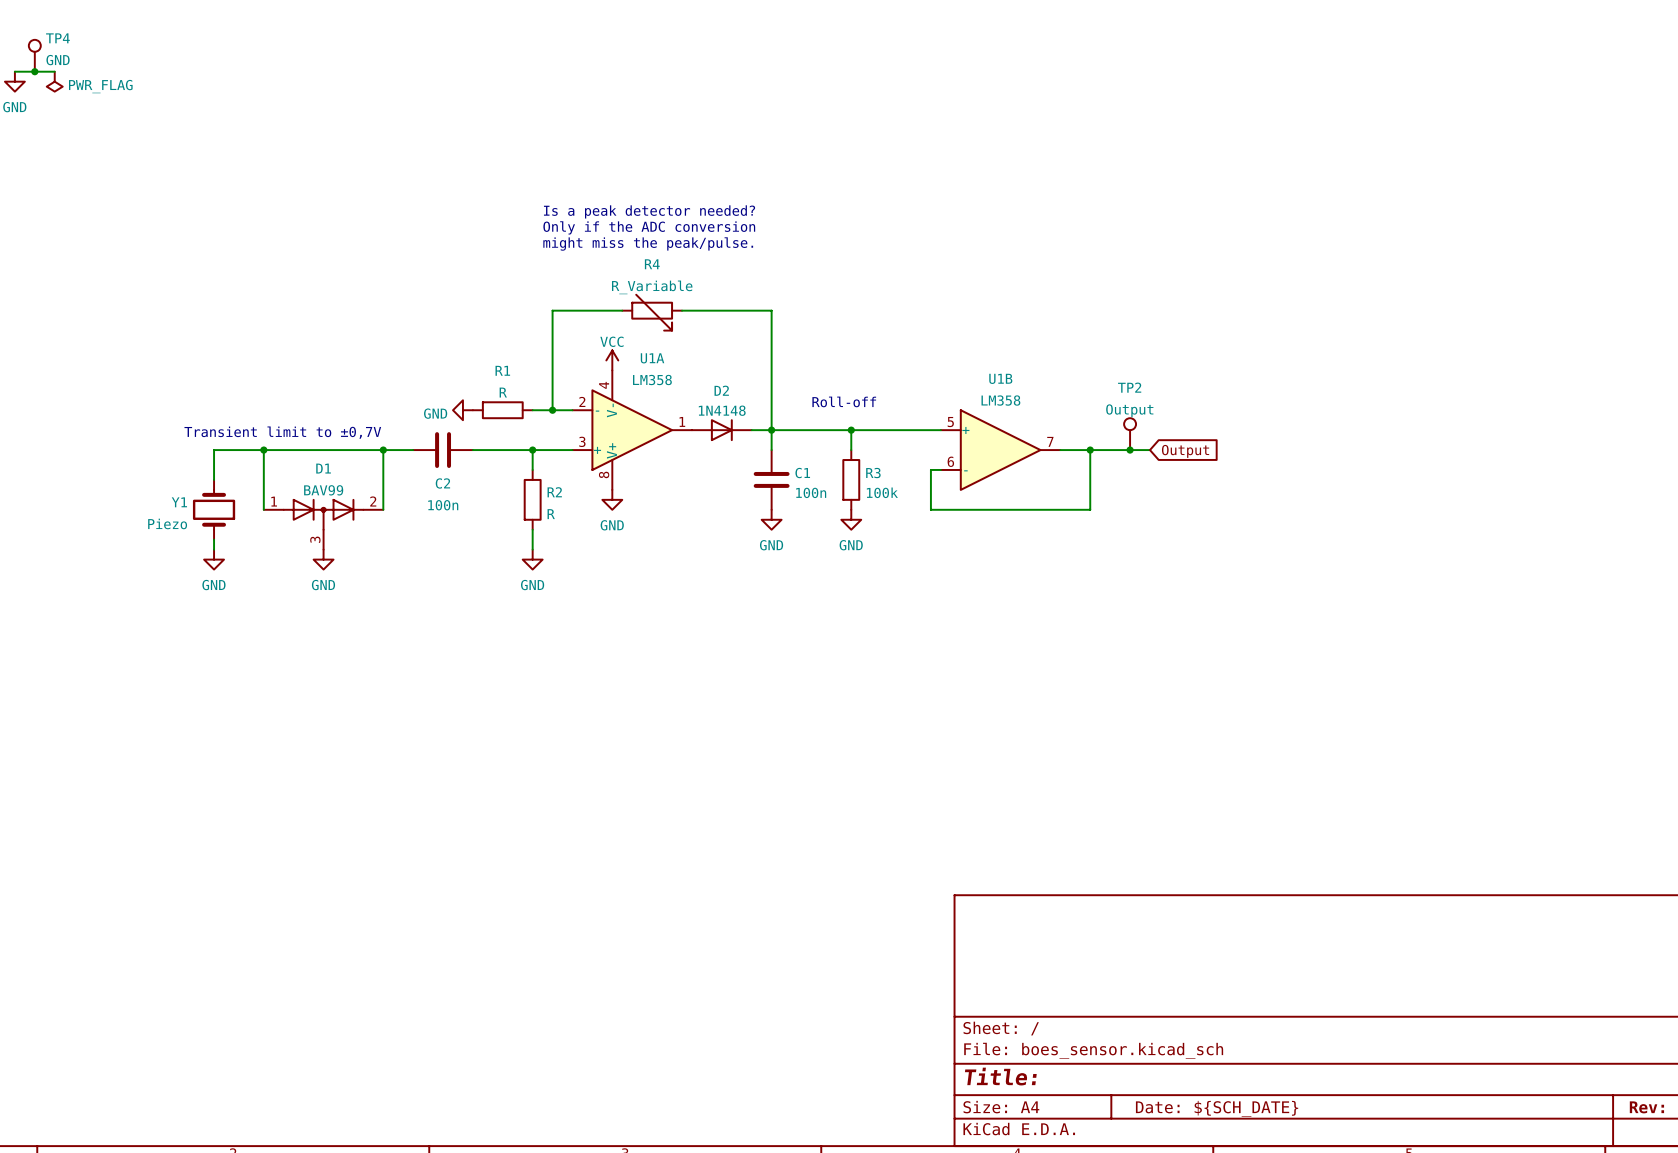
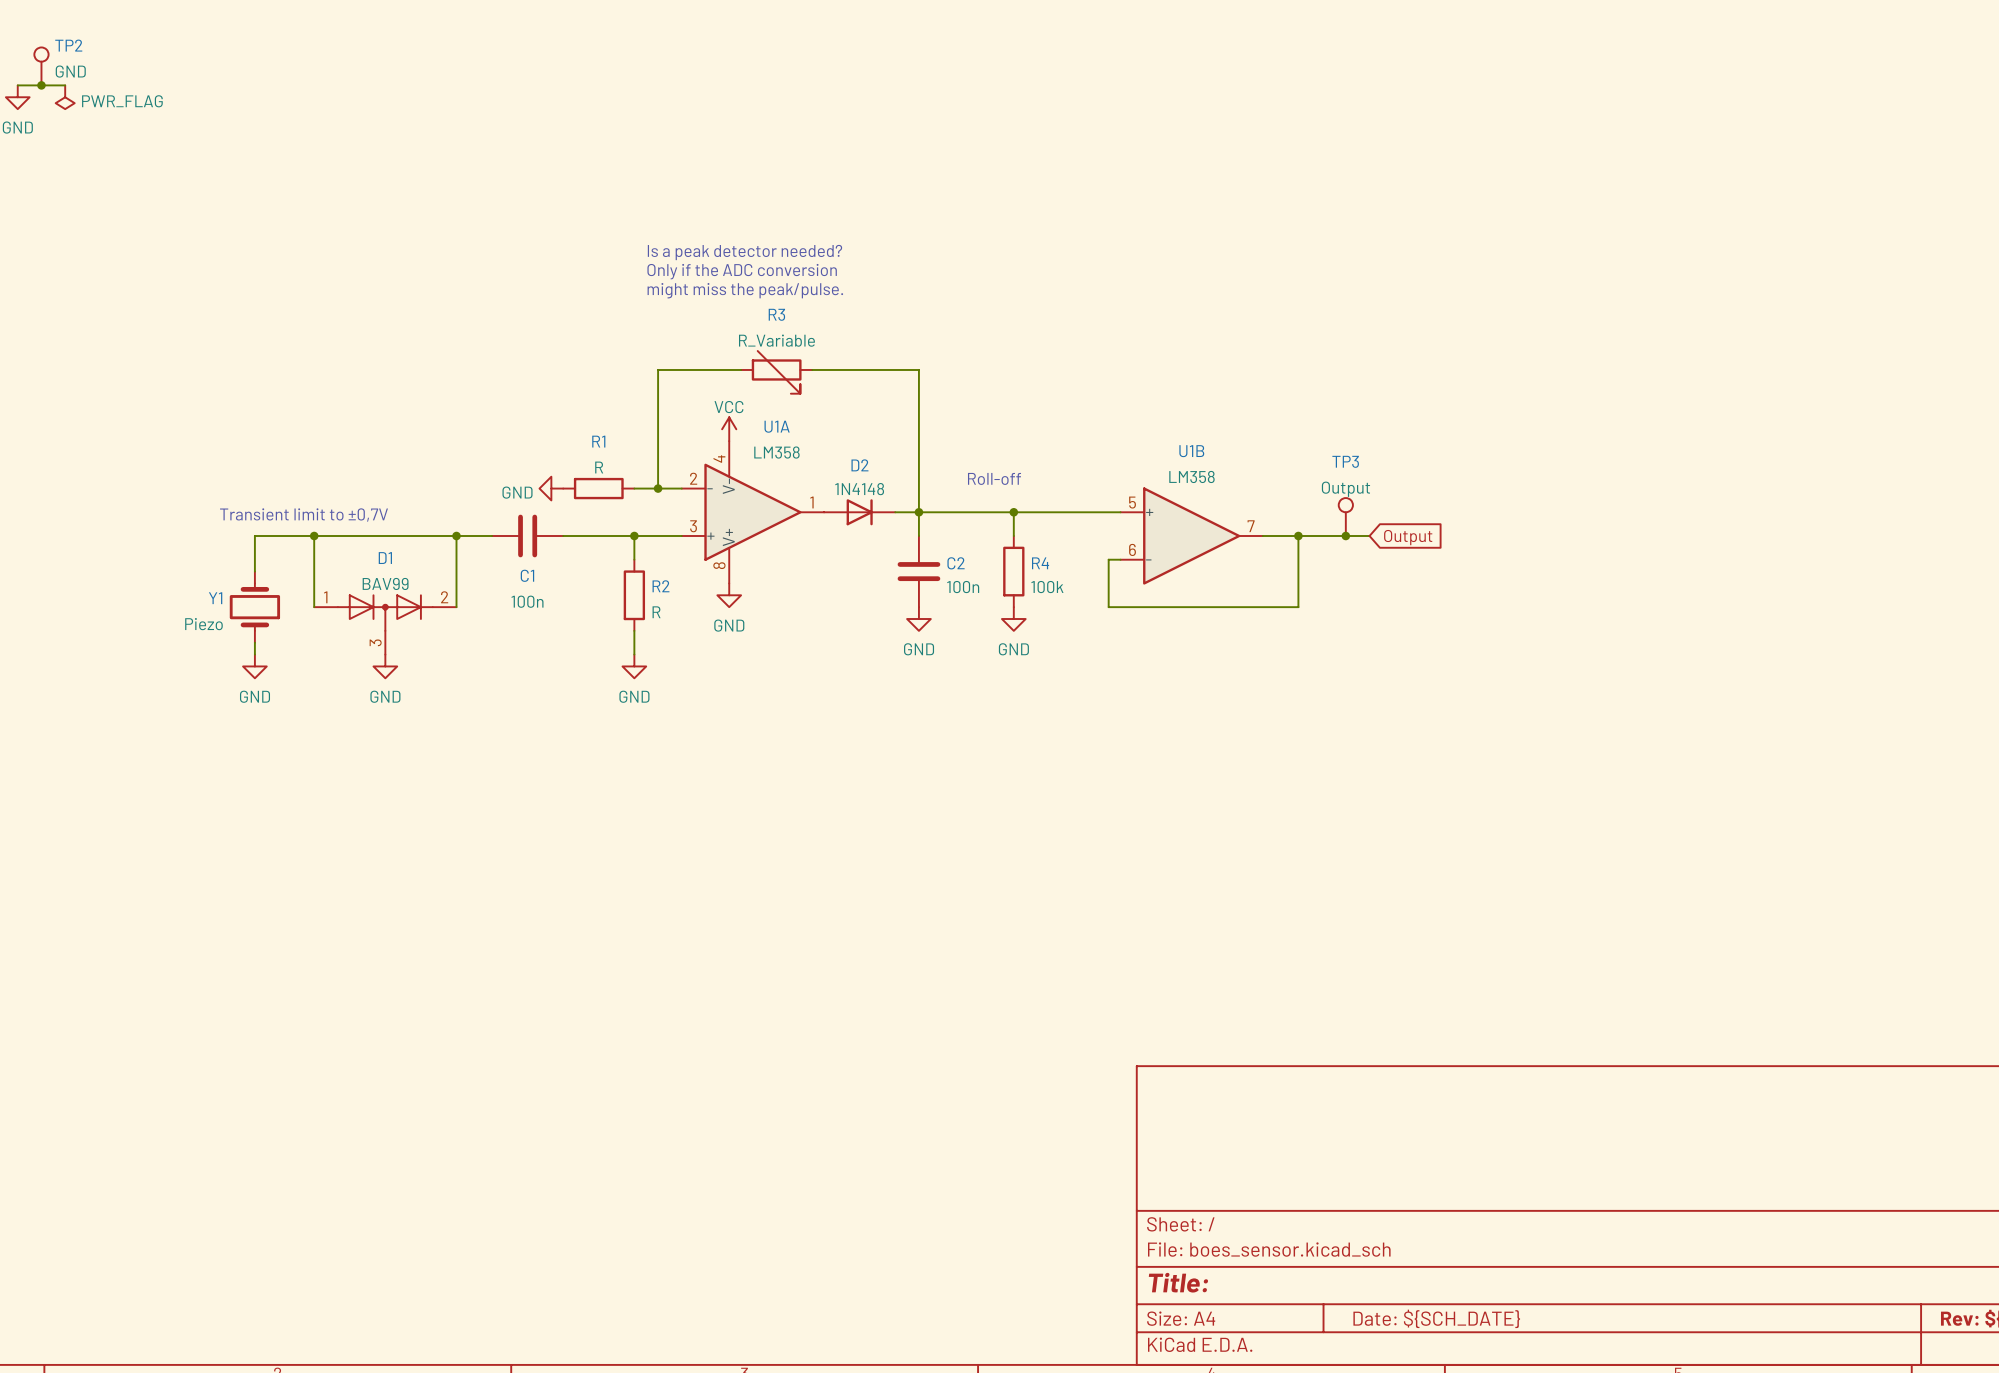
TP4 name: TP4 (57, 38) -> TP2 (68, 45)
R4 name: R4 (652, 264) -> R3 (776, 314)
TP2 name: TP2 (1129, 387) -> TP3 (1345, 461)
C1 name: C1 (802, 473) -> C2 (956, 563)
R3 name: R3 (873, 473) -> R4 (1040, 563)
C2 name: C2 (442, 483) -> C1 (527, 575)

